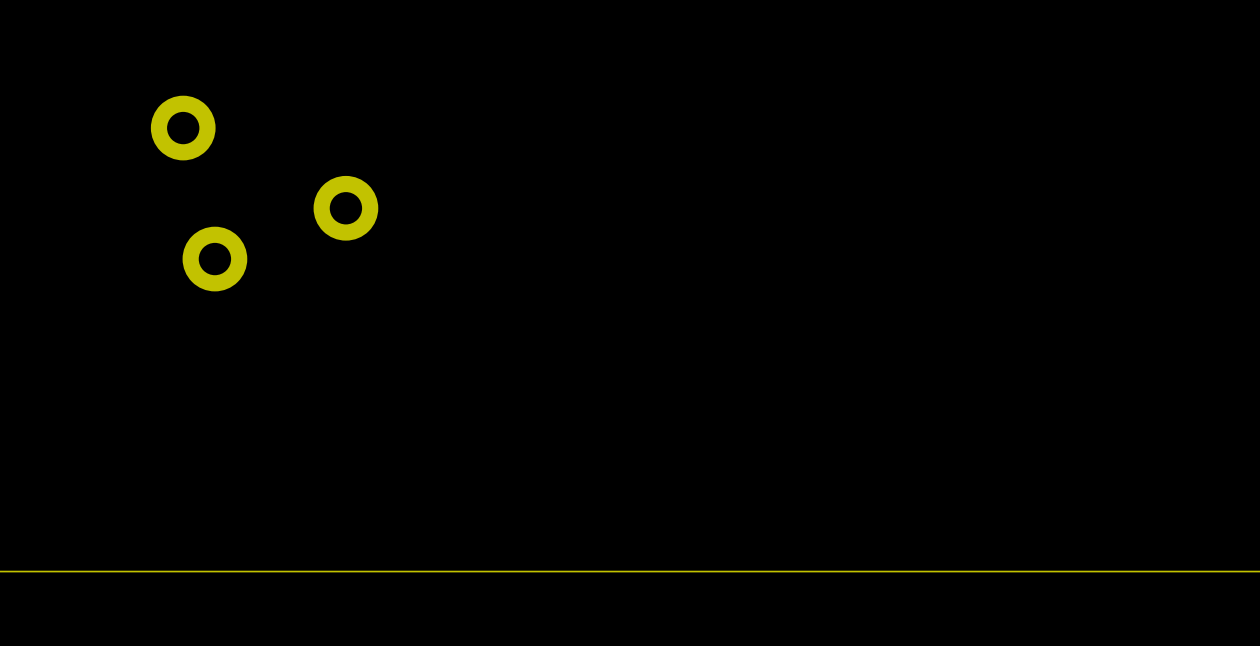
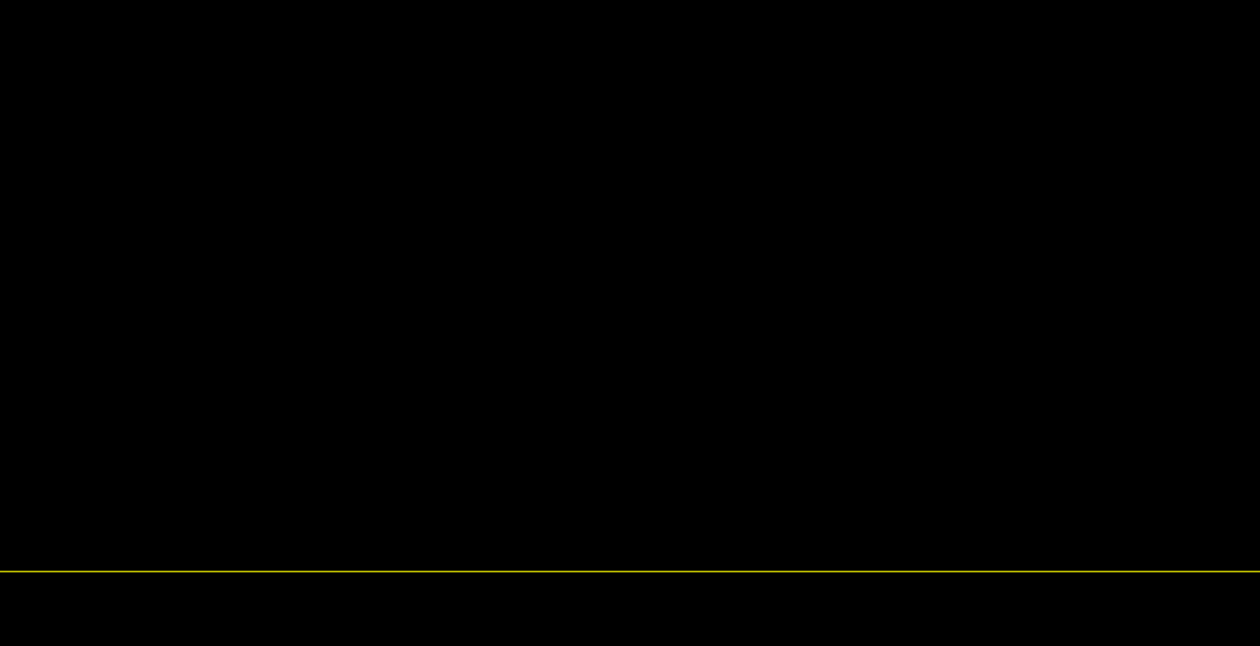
part: (183, 128) -> none
part: (345, 208) -> none
part: (214, 259) -> none

